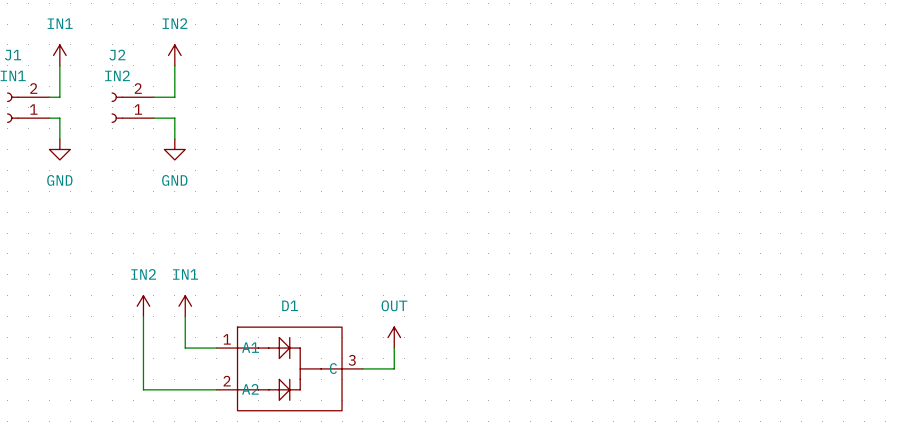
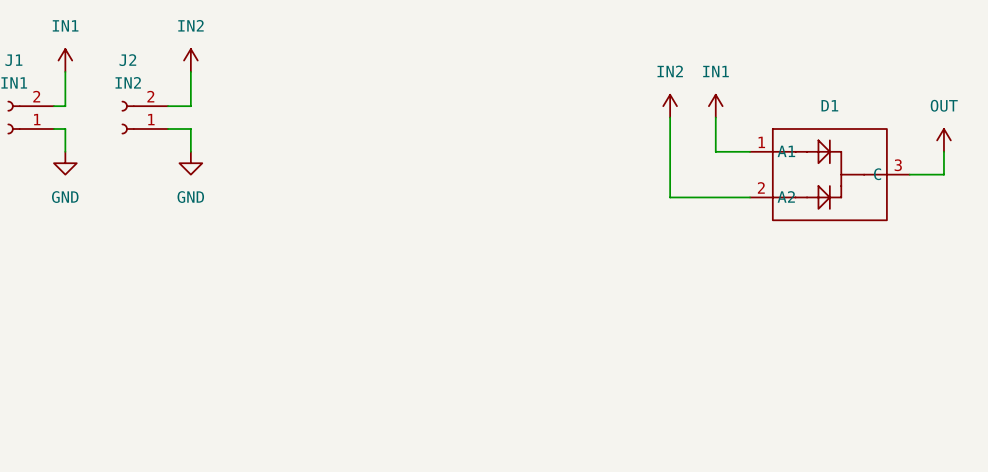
power symbol: none -> IN2 (670, 106)
power symbol: none -> IN1 (715, 106)
wire: none -> (670, 117) (670, 197) (749, 197)
wire: none -> (715, 117) (715, 151) (749, 151)
power symbol: none -> OUT (943, 140)
wire: none -> (943, 151) (943, 174) (909, 174)
power symbol: IN2 (143, 306) -> none
power symbol: IN1 (185, 306) -> none
wire: (143, 316) (143, 389) (216, 389) -> none
wire: (185, 316) (185, 348) (216, 348) -> none
power symbol: OUT (394, 337) -> none
wire: (394, 348) (394, 368) (362, 368) -> none
D1 position: (289, 368) -> (829, 174)

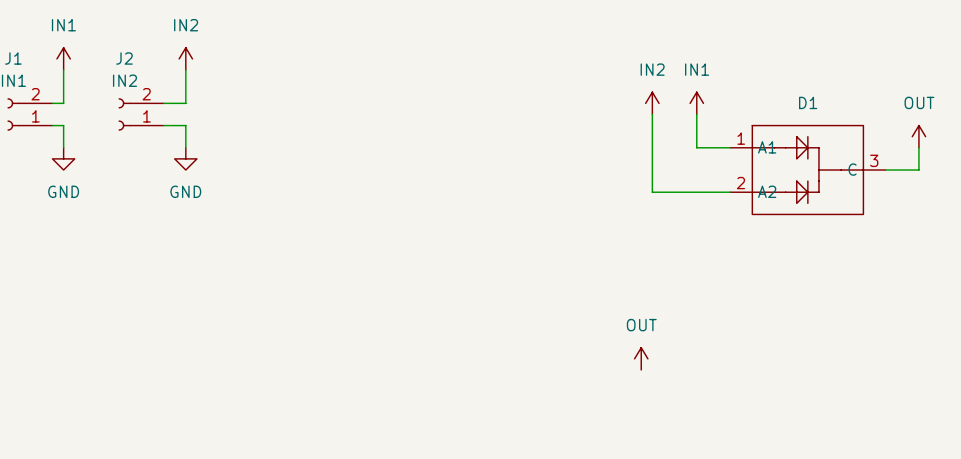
power symbol: none -> OUT (641, 358)

